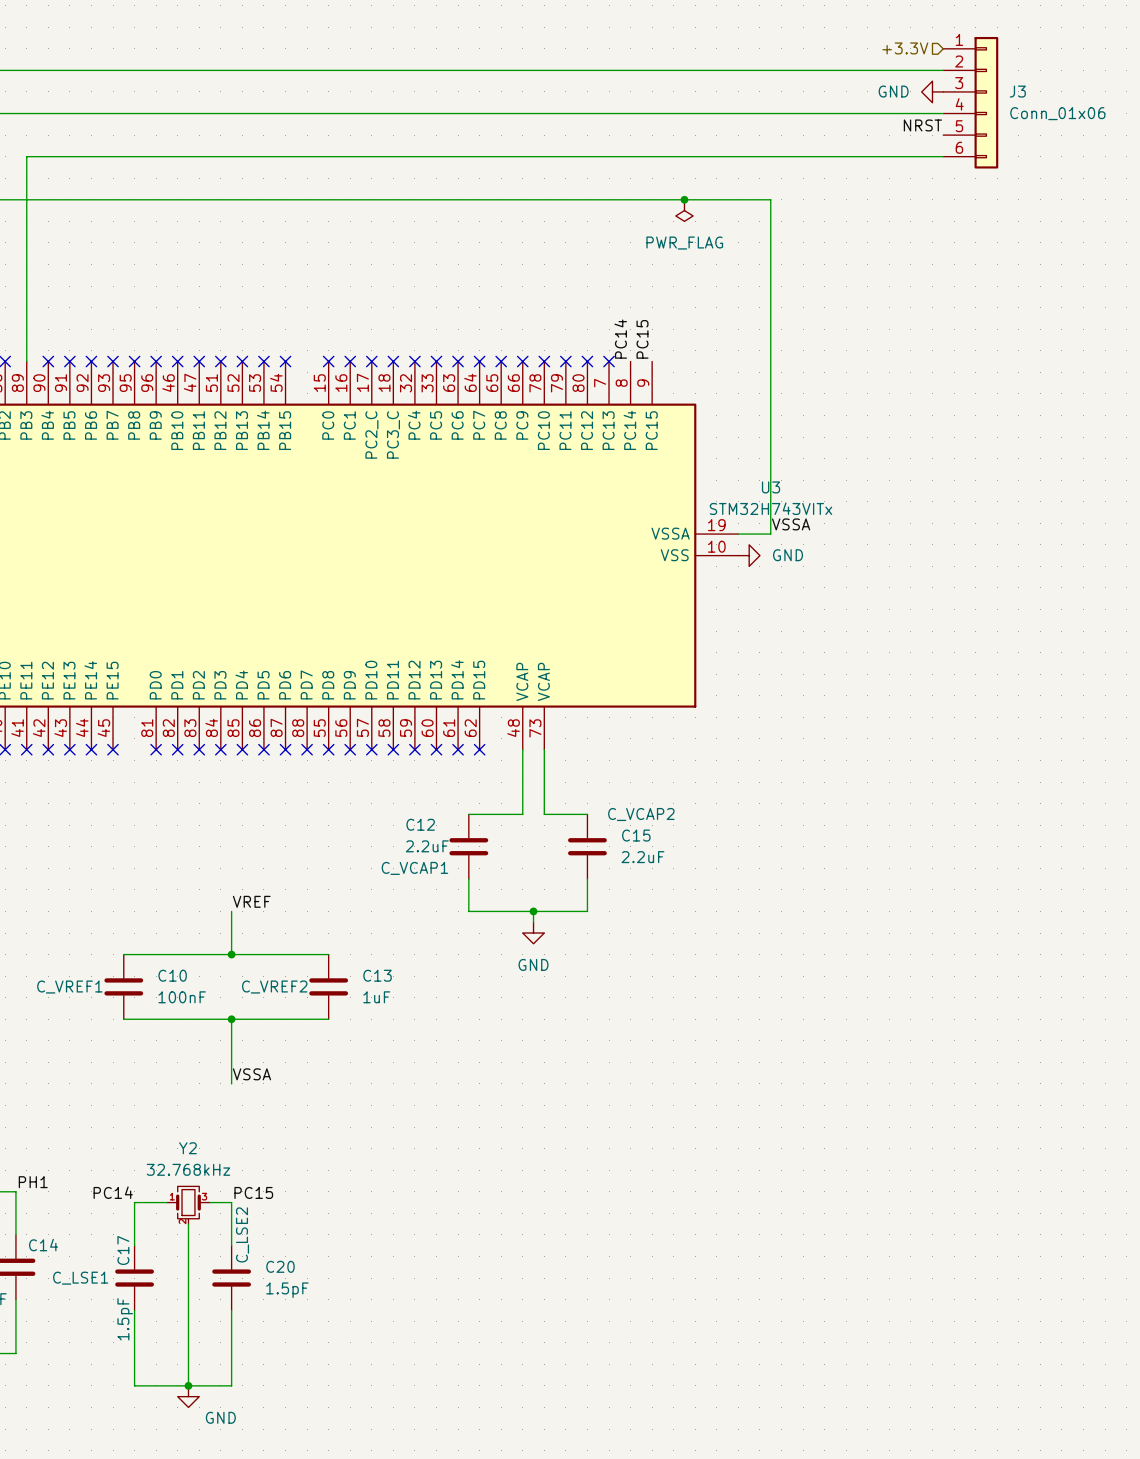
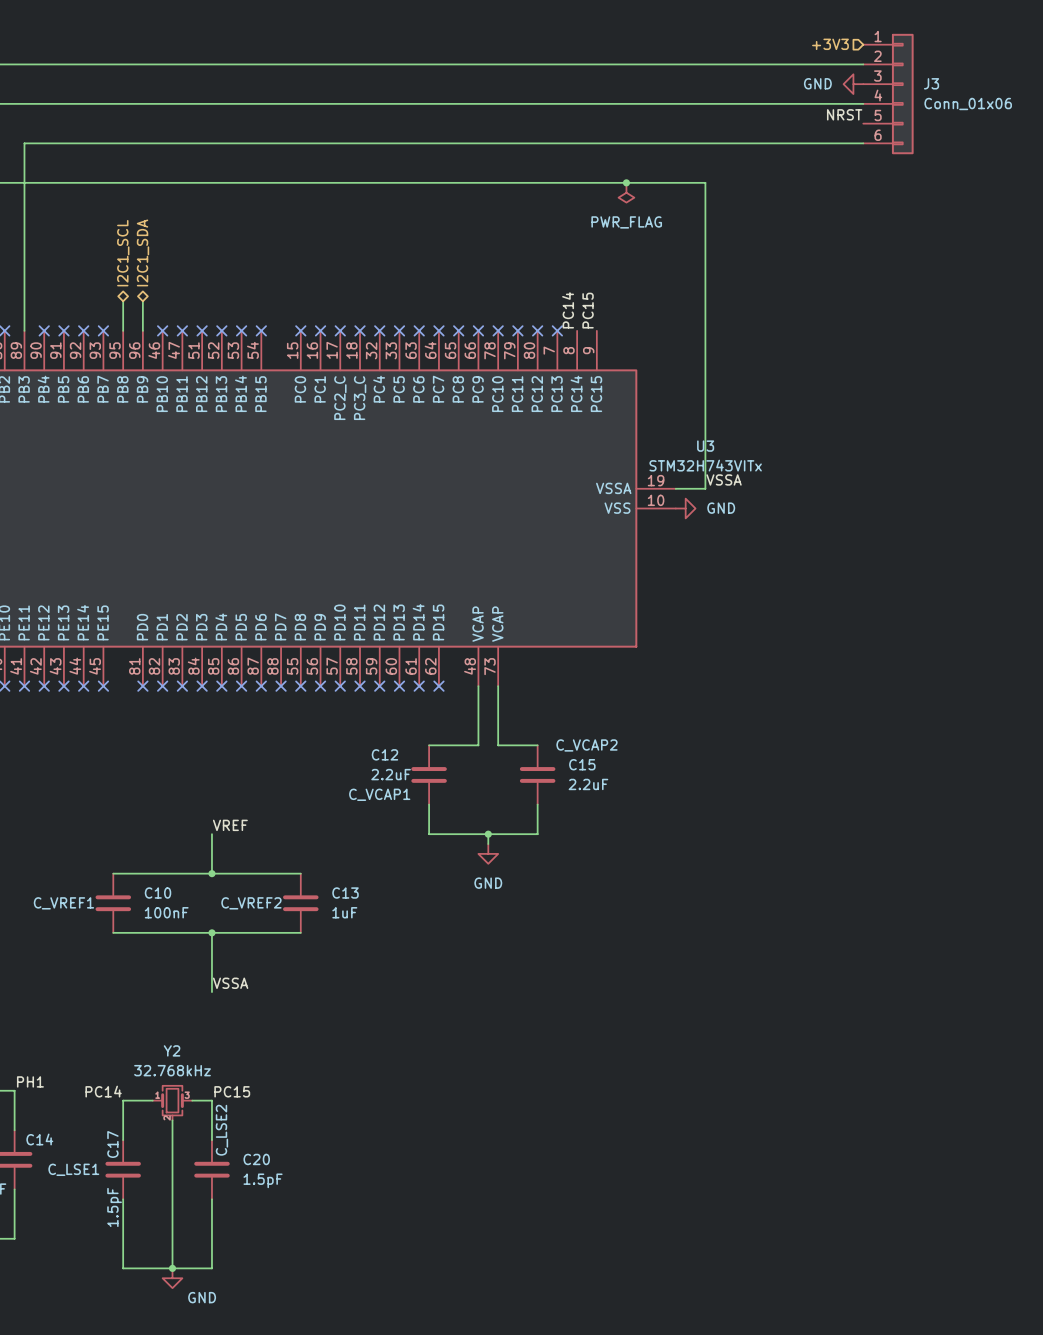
hierarchical label: +3.3V (905, 48) -> +3V3 (830, 44)
hierarchical label: none -> I2C1_SCL (123, 253)
hierarchical label: none -> I2C1_SDA (143, 252)
wire: none -> (123, 301) (123, 330)
wire: none -> (142, 301) (142, 330)
no-connect mark: (134, 361) -> none
no-connect mark: (156, 361) -> none

